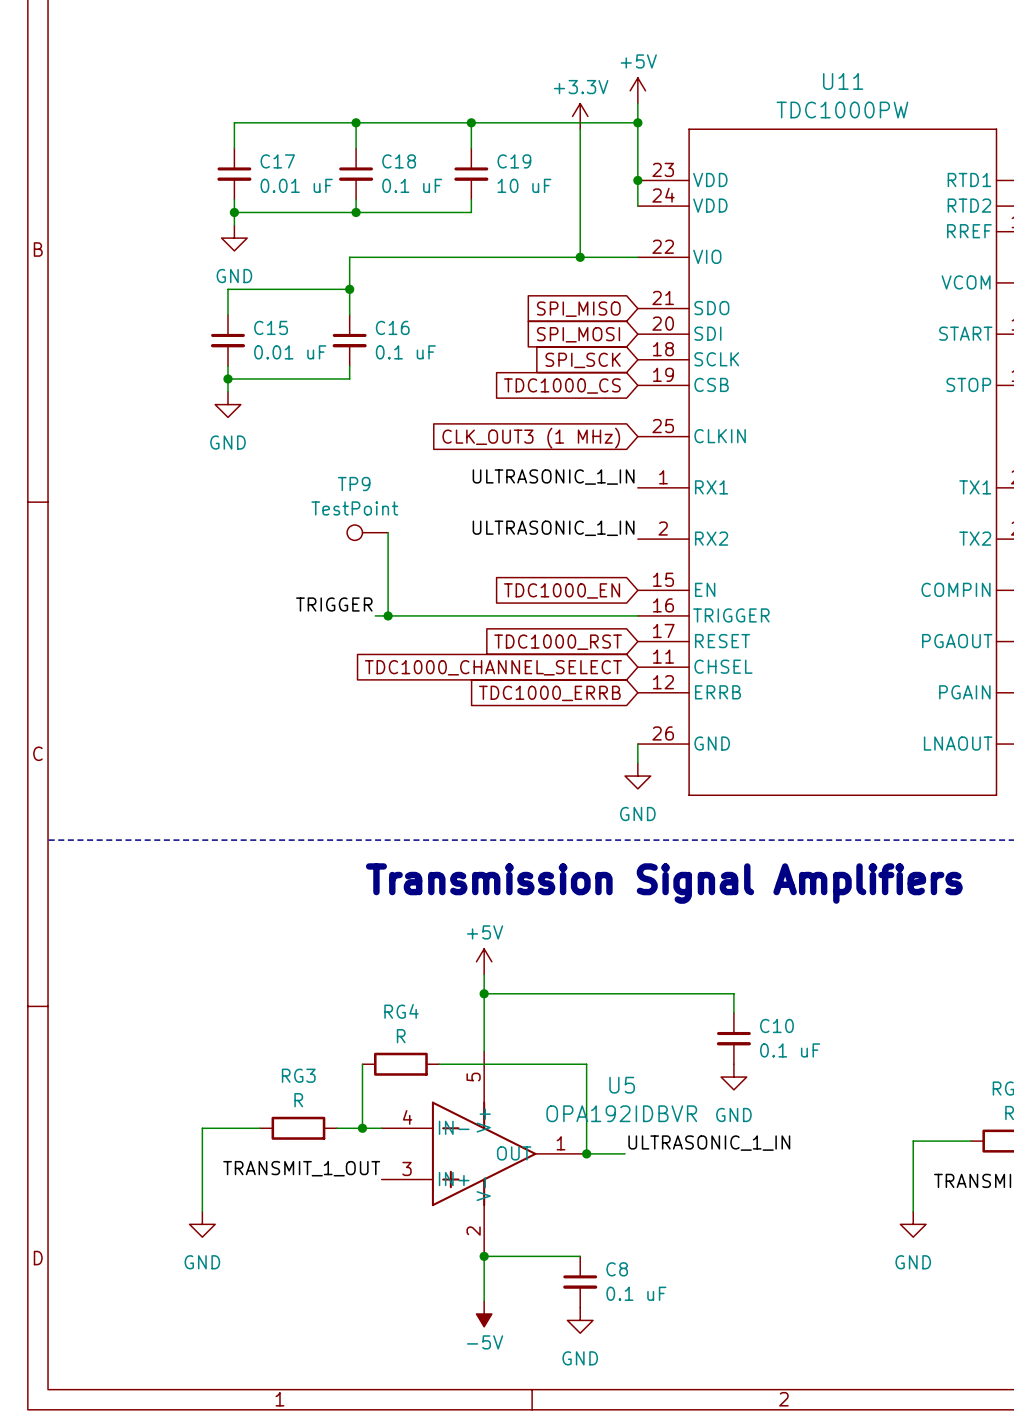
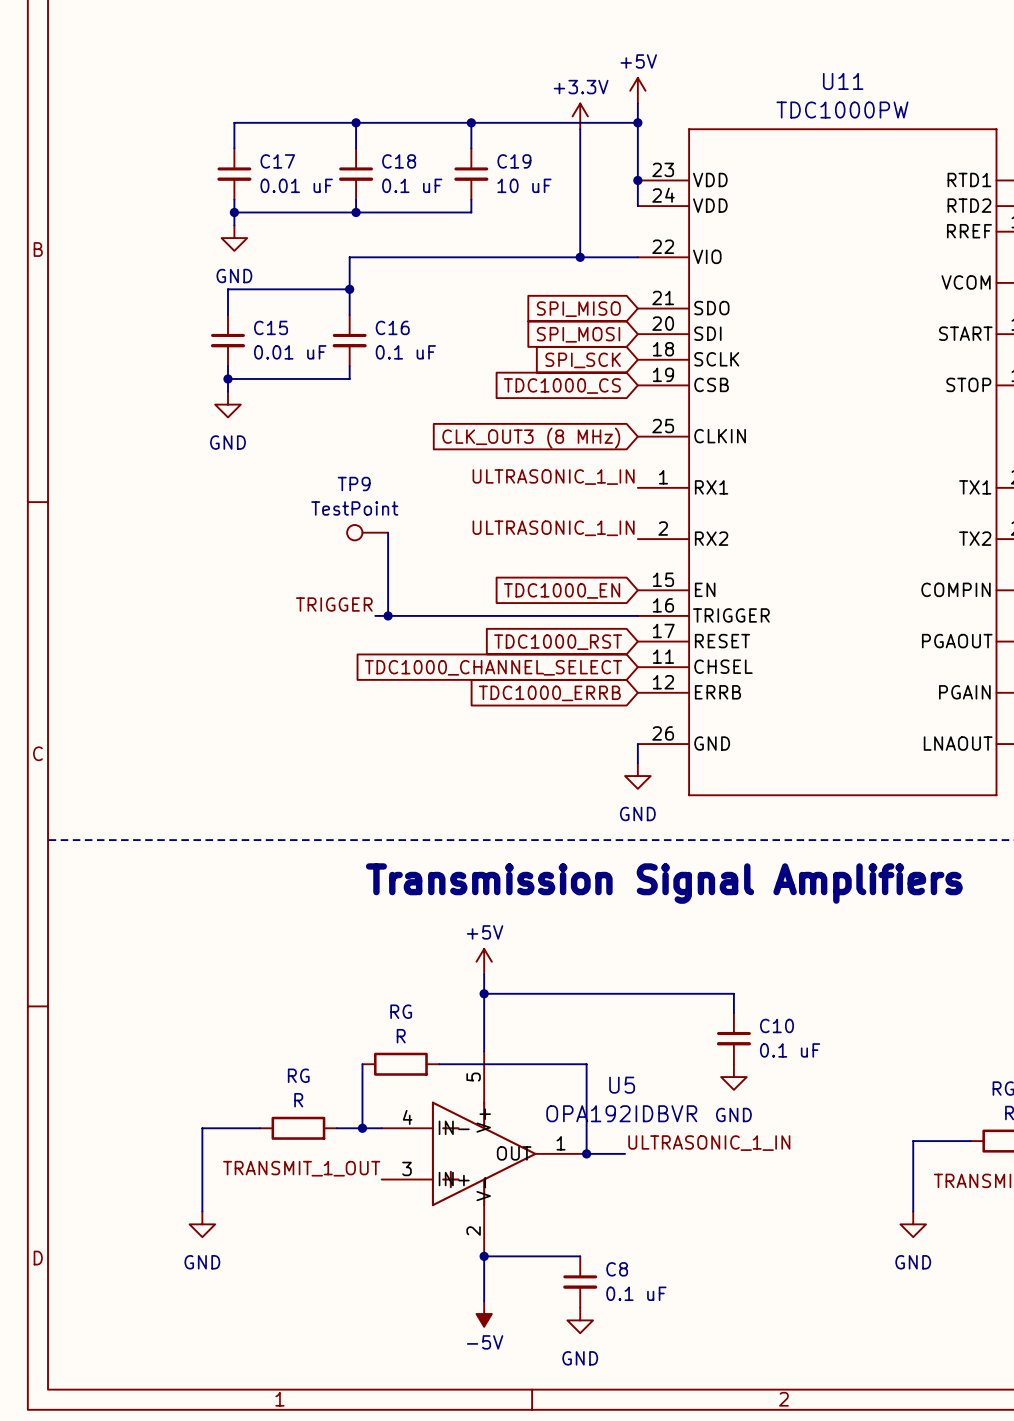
global label: CLK_OUT3 (1 MHz) (531, 438) -> CLK_OUT3 (8 MHz) (531, 438)
RG4 name: RG4 (401, 1011) -> RG (401, 1011)
RG3 name: RG3 (298, 1075) -> RG (298, 1075)

